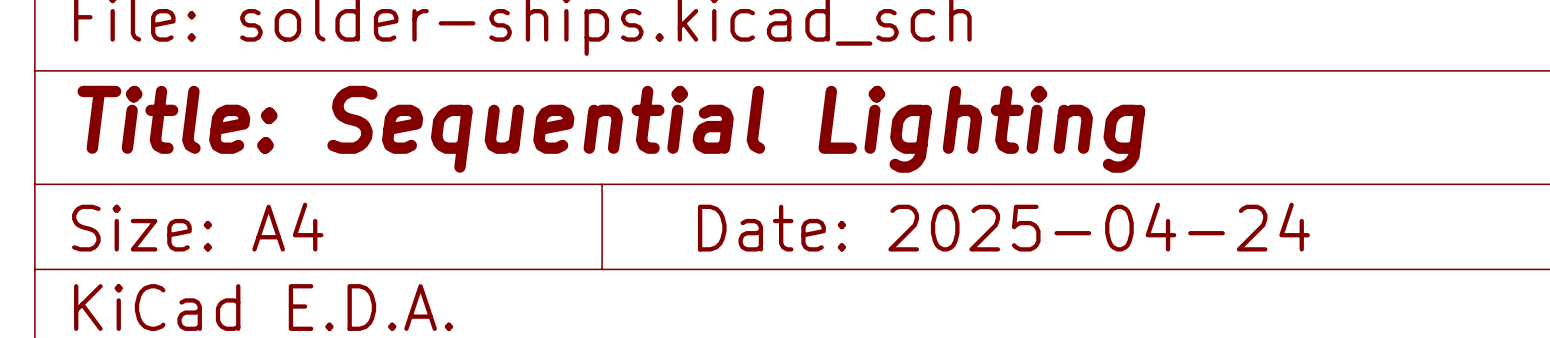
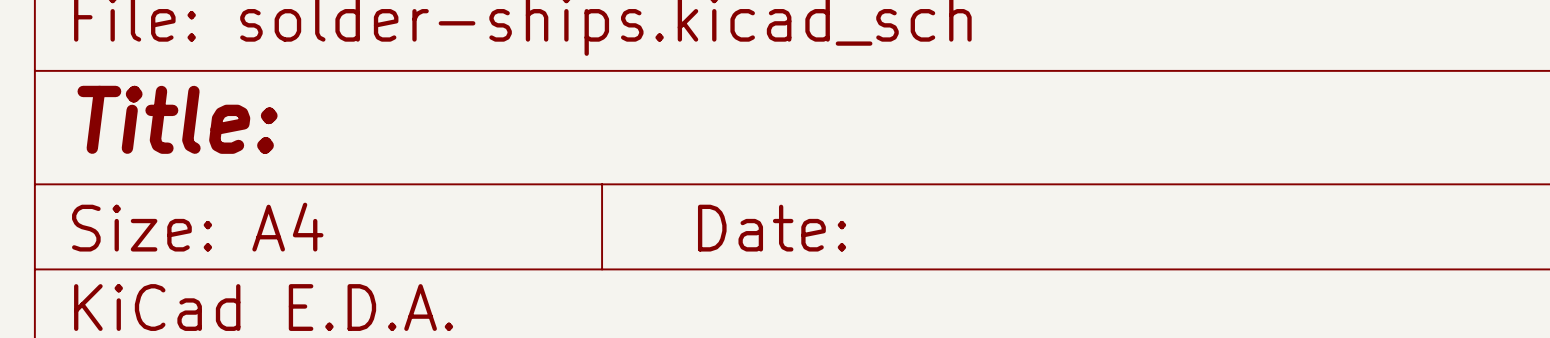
title block: Title: Sequential Lighting (611, 129) -> Title: (177, 119)
title block: Date: 2025-04-24 (1003, 227) -> Date: (772, 228)

